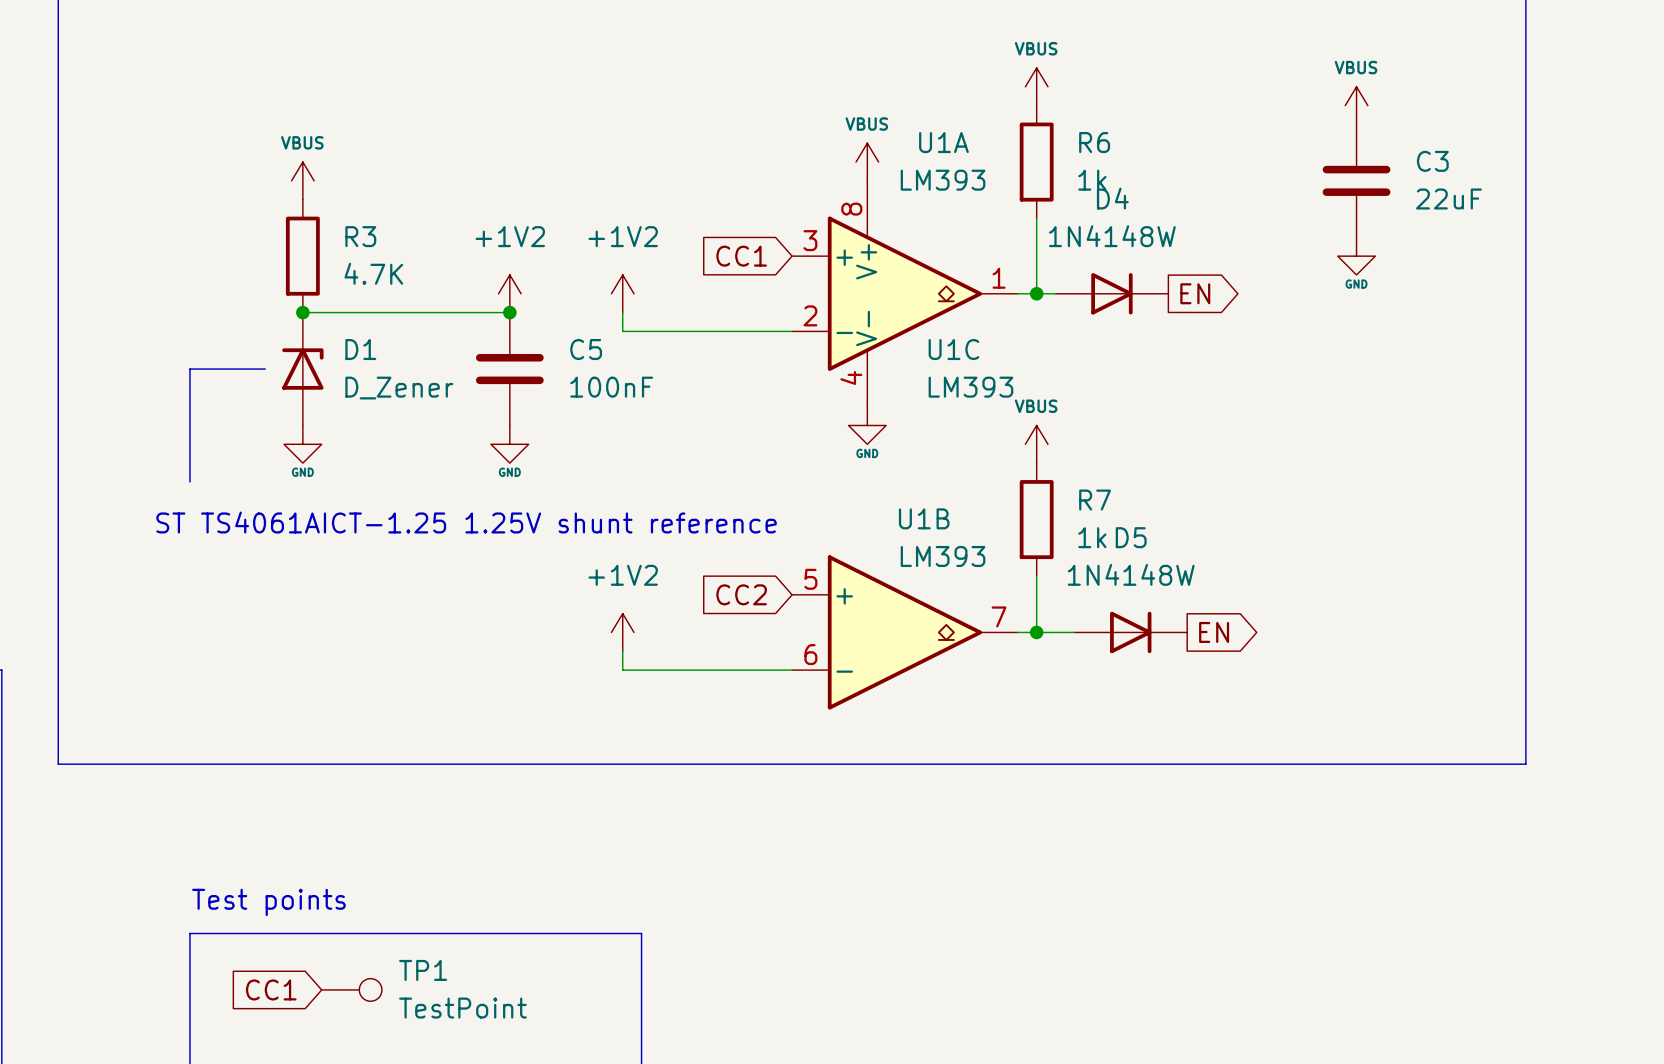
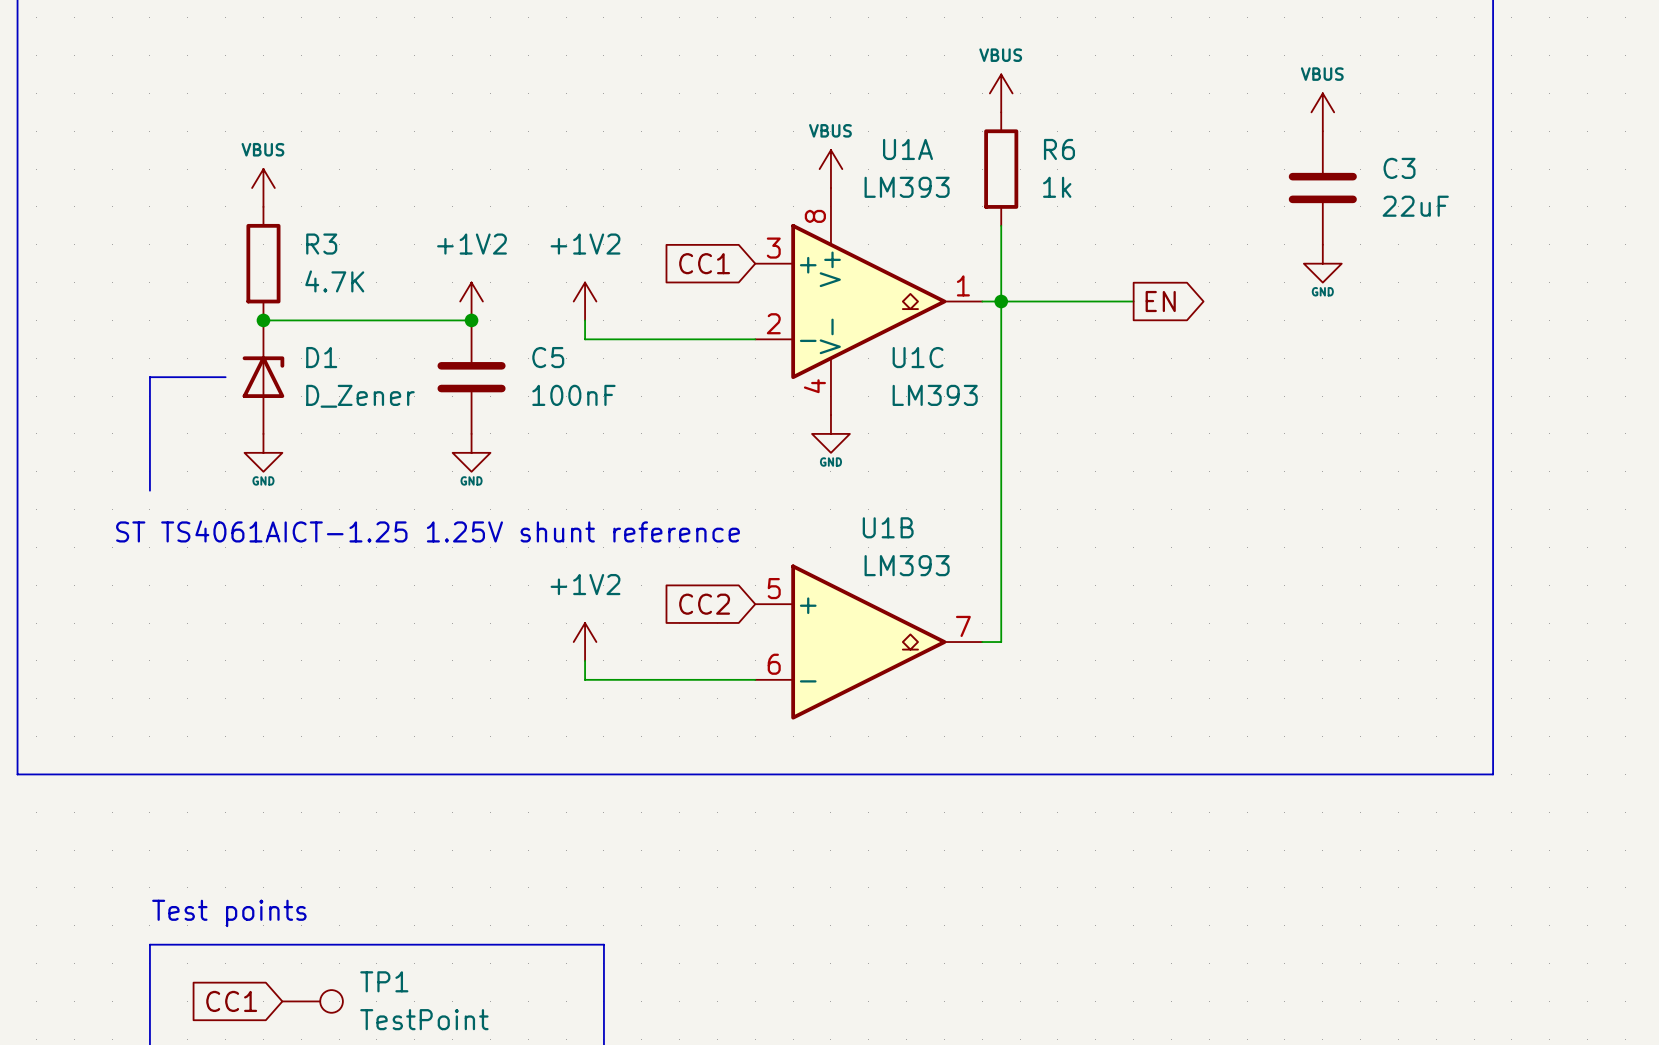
wire: none -> (1001, 301) (1001, 585)
D4: 1N4148W (1111, 293) -> none
power symbol: VBUS (1036, 444) -> none
R7: 1k (1036, 519) -> none
wire: (1036, 632) (1074, 632) -> none
junction: (1036, 632) -> none
D5: 1N4148W (1130, 632) -> none
global label: EN (1214, 632) -> none

